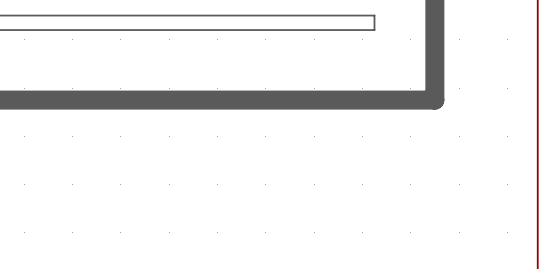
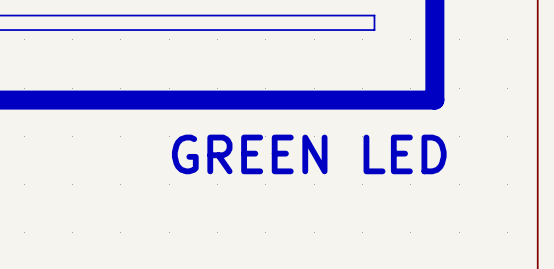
text: none -> GREEN LED (309, 154)

